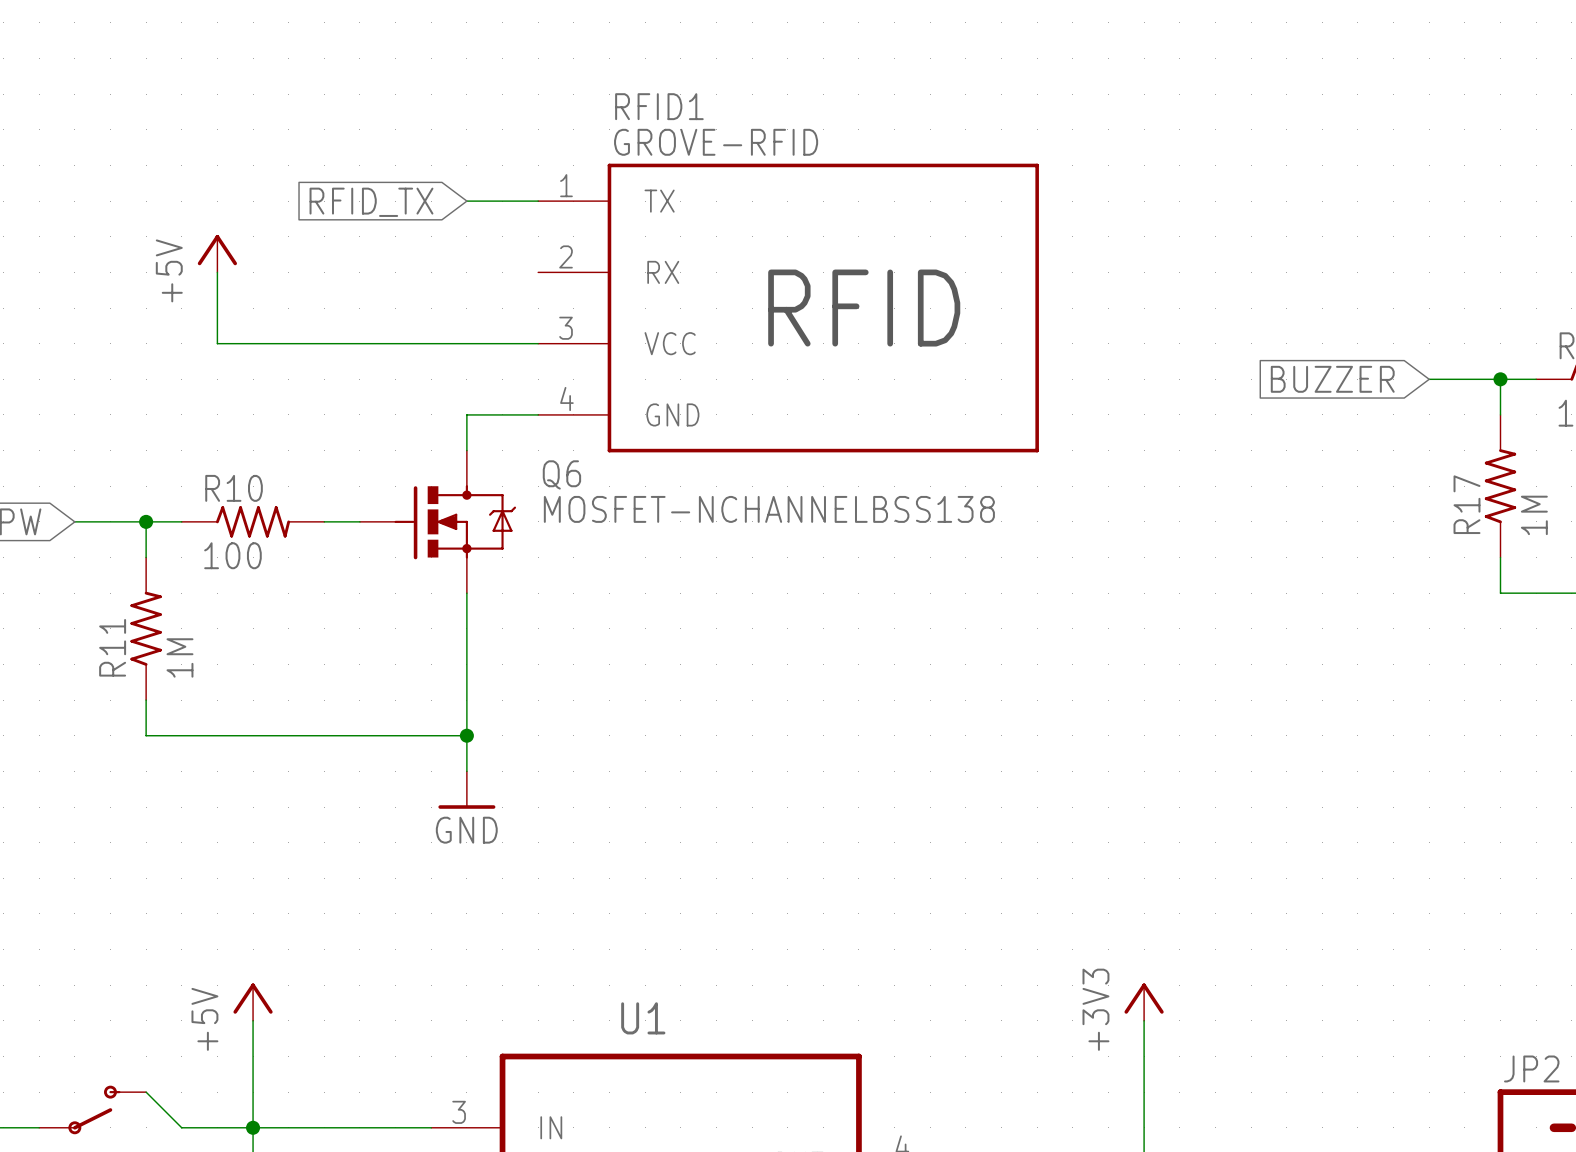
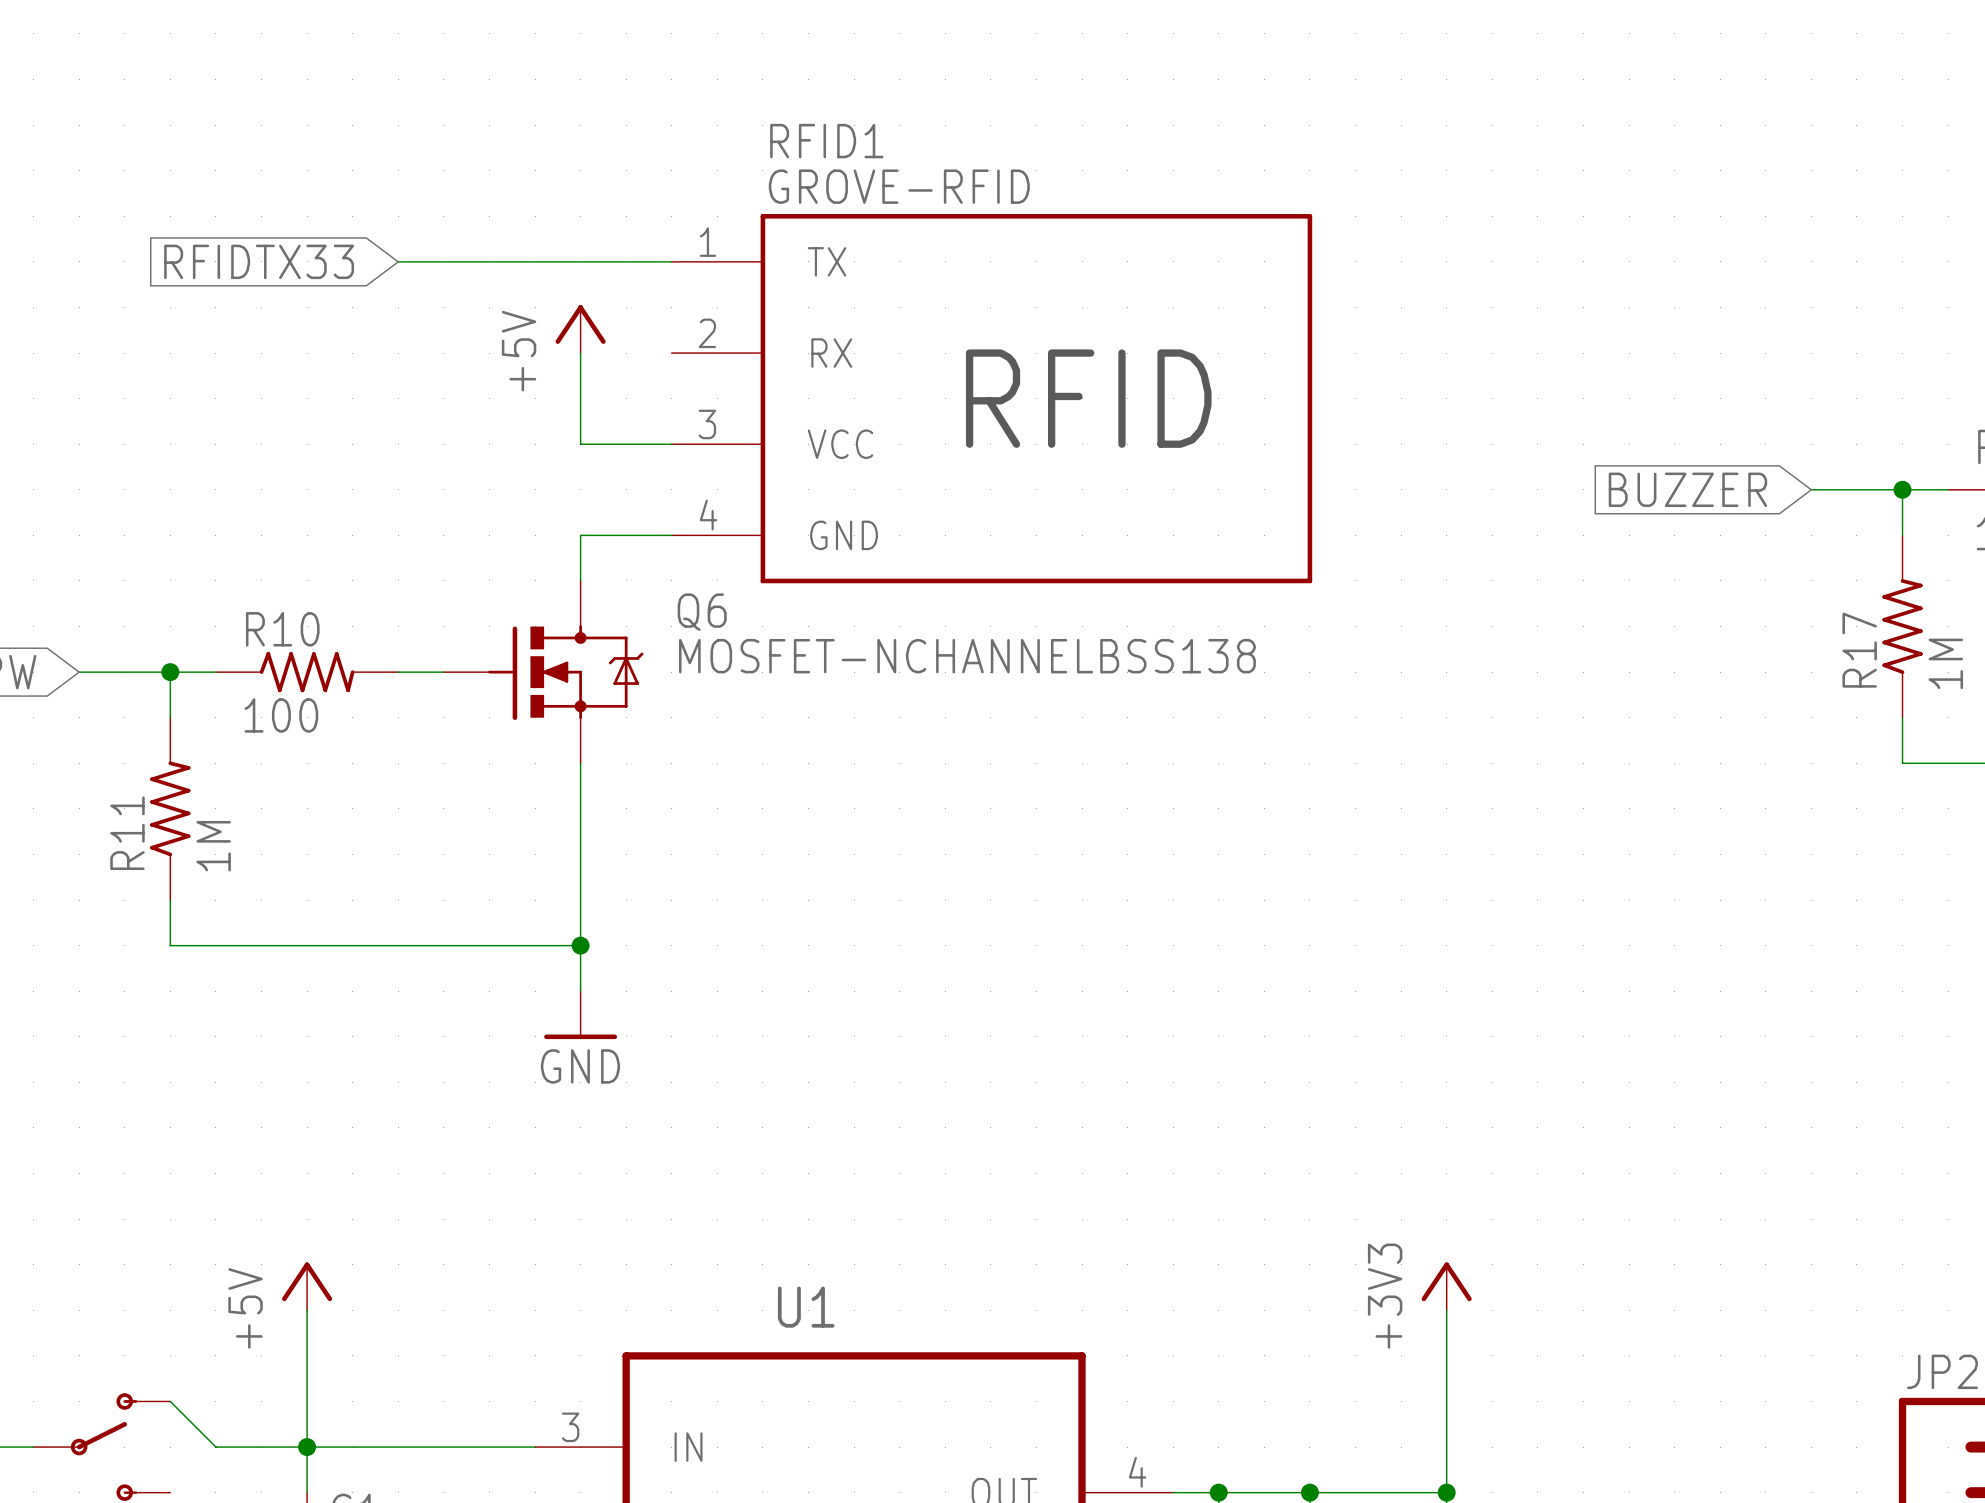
wire: none -> (398, 261) (580, 261)
global label: RFID_TX (371, 202) -> RFIDTX33 (259, 261)
power symbol position: +5V (217, 253) -> +5V (580, 329)
wire: (217, 272) (217, 343) (466, 343) -> (580, 353) (580, 444)

